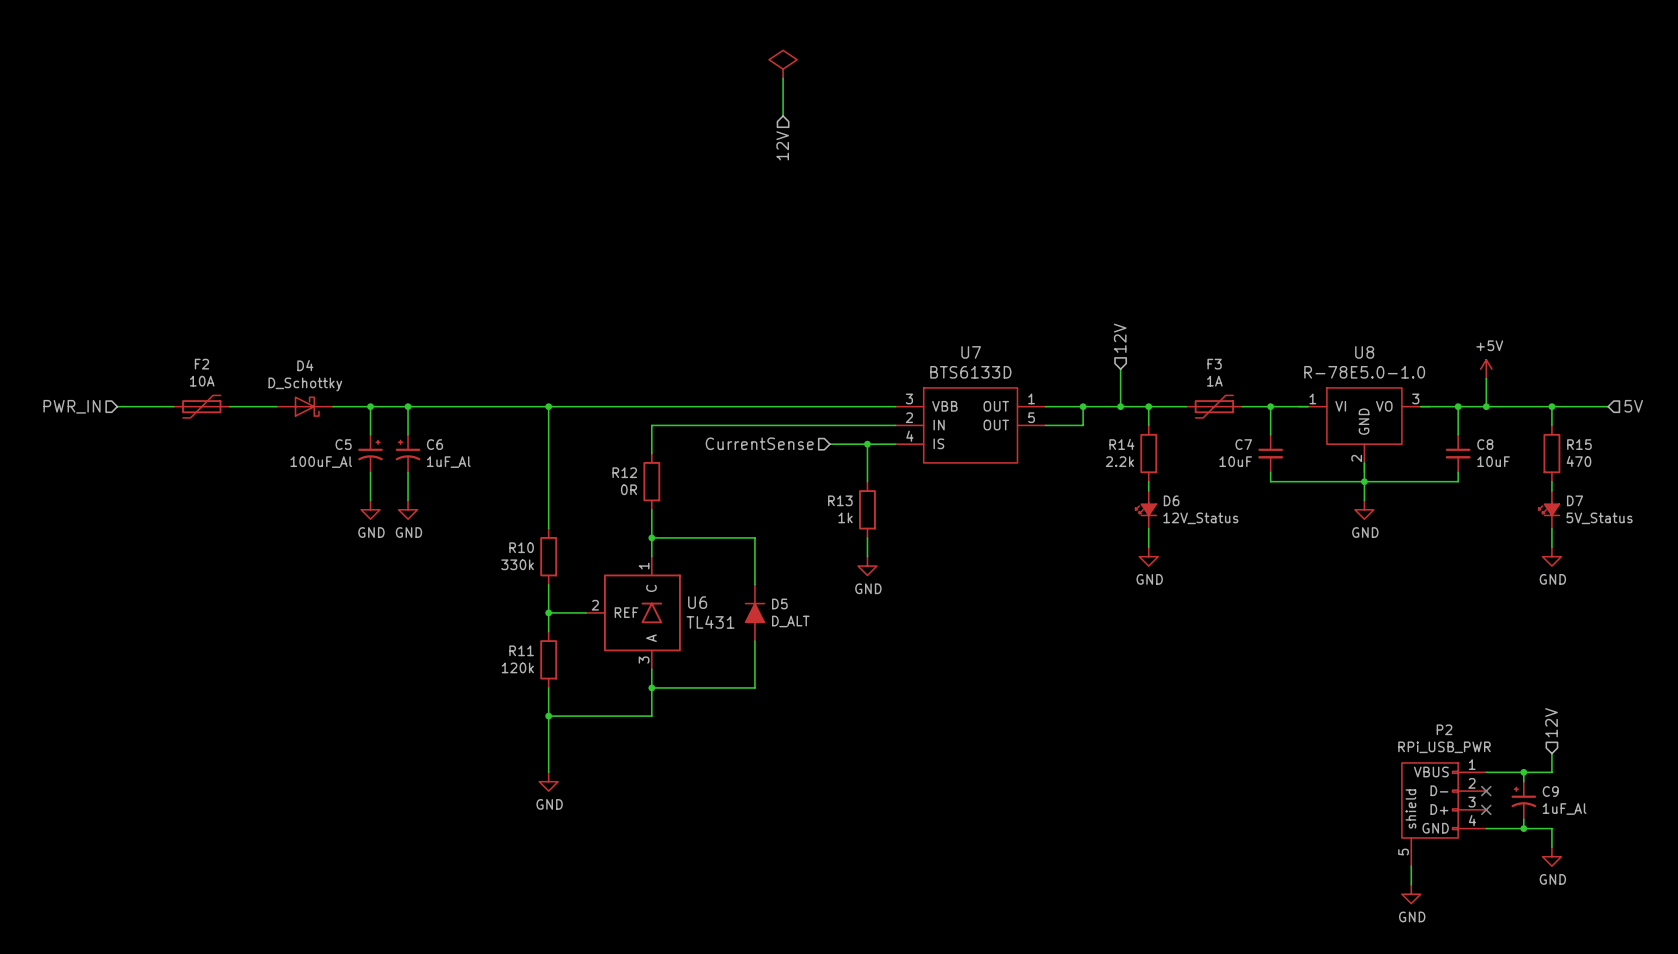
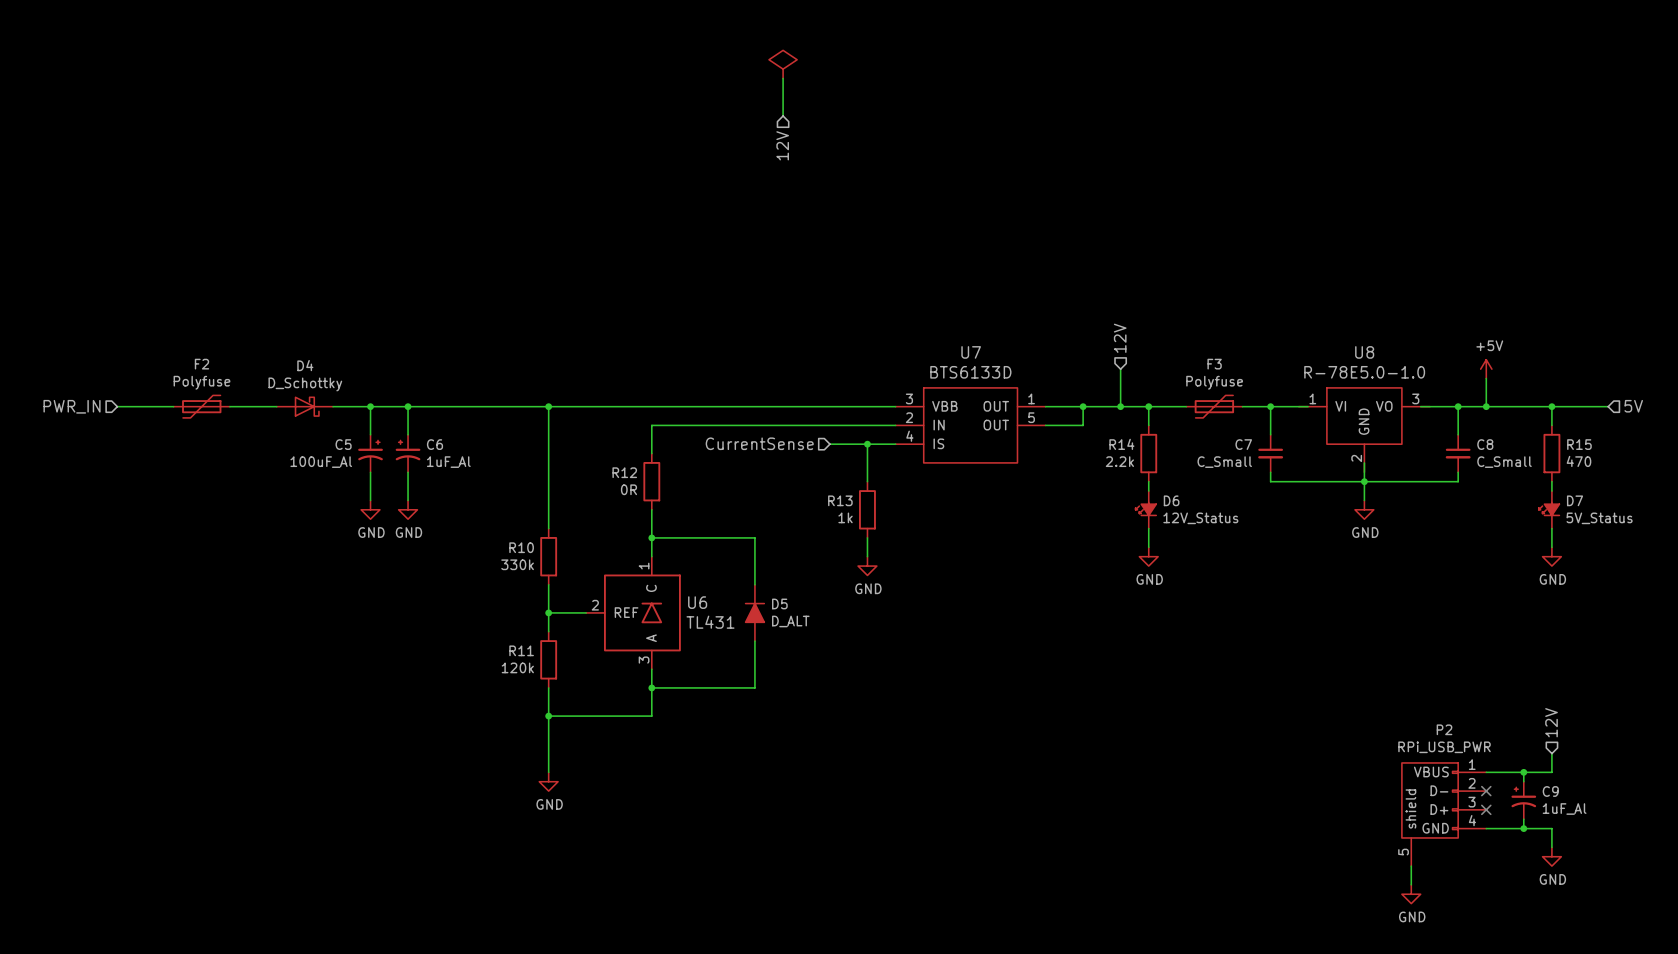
F2 value: 10A (202, 381) -> Polyfuse (201, 382)
F3 value: 1A (1214, 381) -> Polyfuse (1214, 382)
C7 value: 10uF (1235, 461) -> C_Small (1224, 462)
C8 value: 10uF (1493, 461) -> C_Small (1504, 462)

